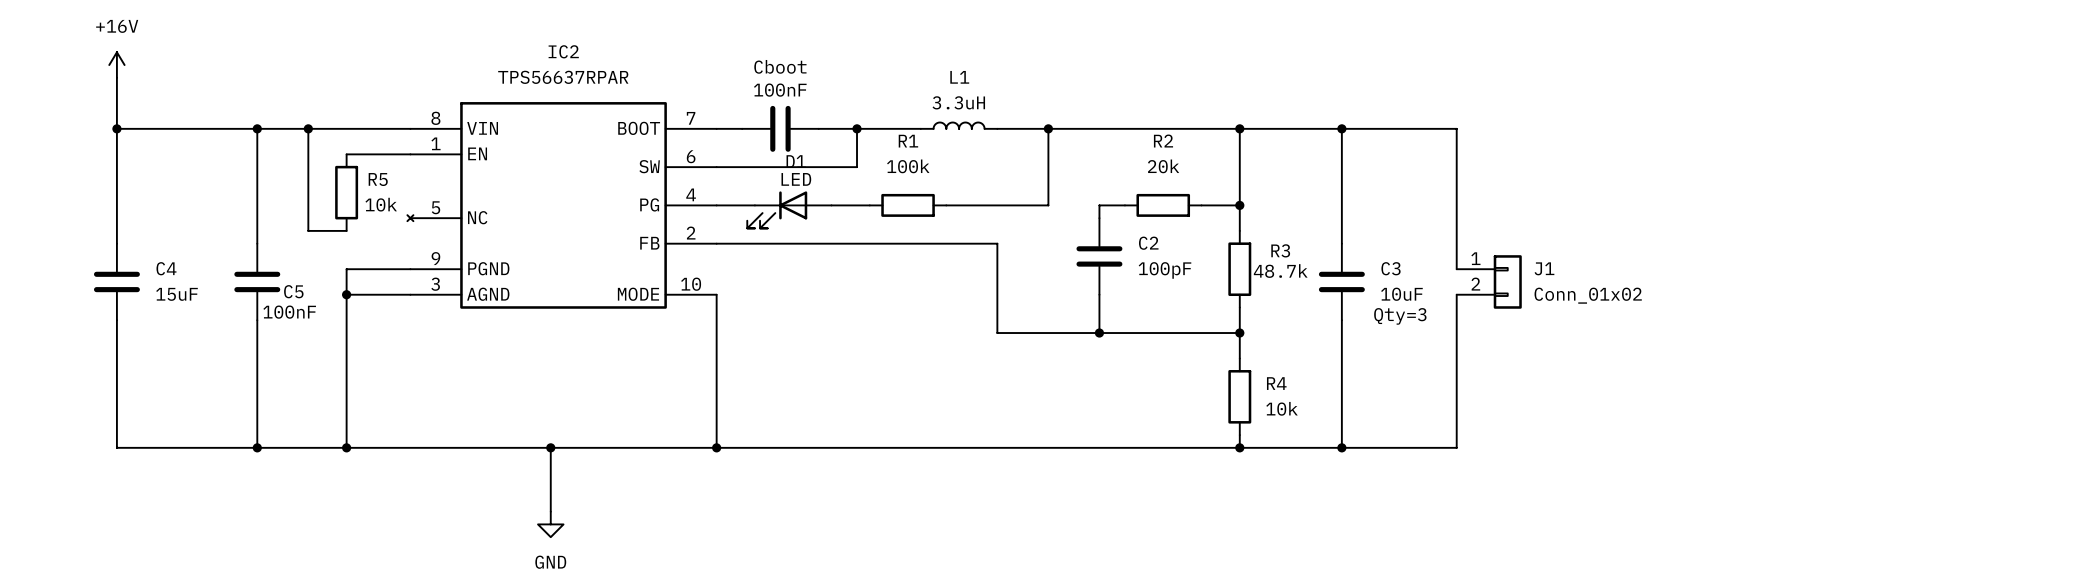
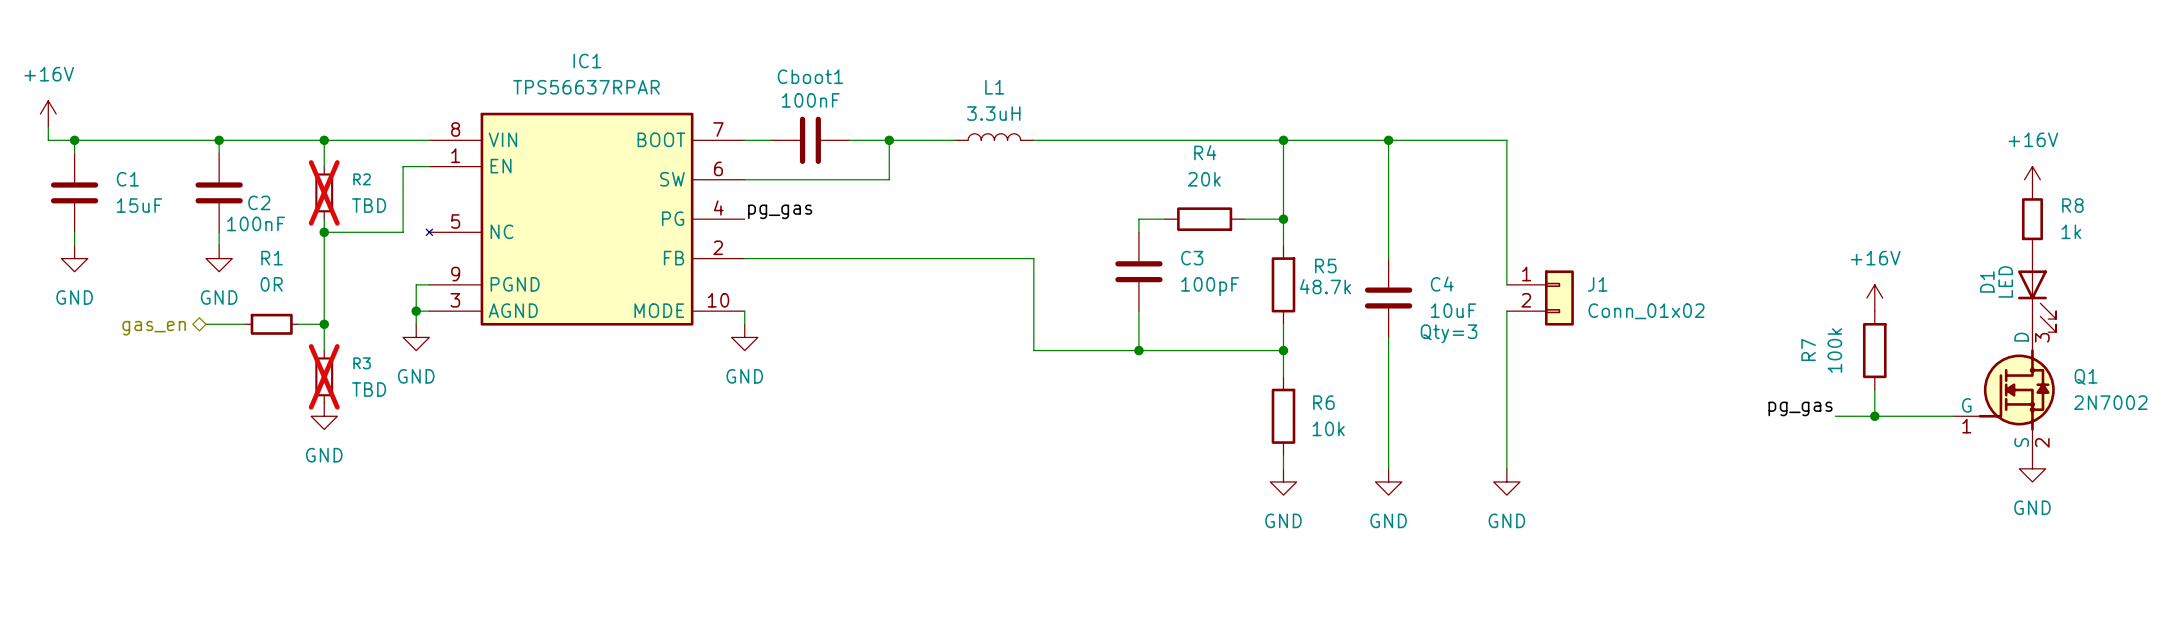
IC2 name: IC2 (563, 51) -> IC1 (587, 61)
power symbol position: +16V (116, 65) -> +16V (48, 114)
Cboot name: Cboot (780, 66) -> Cboot1 (810, 76)
wire: (116, 77) (116, 243) -> none
wire: none -> (48, 127) (48, 140) (127, 140)
wire: none -> (74, 140) (74, 153)
junction: none -> (74, 140)
junction: (116, 128) -> none
wire: none -> (219, 140) (219, 153)
junction: none -> (219, 140)
wire: (257, 128) (257, 243) -> none
junction: (257, 128) -> none
wire: (1048, 128) (1048, 205) (946, 205) -> none
junction: (1048, 128) -> none
R2 name: R2 (1163, 141) -> R4 (1205, 152)
wire: (346, 154) (384, 154) -> (324, 232) (403, 232) (403, 166)
R1 value: 100k (908, 166) -> none
power symbol: none -> +16V (2032, 179)
C1: none -> 15uF (74, 192)
C2: none -> 100nF (219, 192)
R2: none -> TBD (324, 192)
R5: 10k (346, 192) -> none
R1 symbol: [869, 193, 947, 217] -> [245, 313, 298, 335]
label: none -> pg_gas (780, 211)
wire: (716, 205) (754, 205) -> none
wire: (831, 205) (869, 205) -> none
R8: none -> (2032, 219)
D1 rotation: 0° (777, 209) -> 90° counterclockwise (2037, 301)
D1 position: (789, 209) -> (2037, 288)
wire: none -> (74, 232) (74, 245)
wire: none -> (219, 232) (219, 245)
junction: none -> (324, 232)
wire: (308, 230) (346, 230) -> (324, 245) (324, 350)
power symbol: none -> GND (74, 258)
power symbol: none -> GND (219, 258)
C2 name: C2 (1148, 243) -> C3 (1192, 258)
R3 name: R3 (1280, 250) -> R5 (1325, 265)
R1 text: none -> 0R (271, 284)
C3 name: C3 (1391, 268) -> C4 (1442, 284)
wire: (397, 269) (346, 269) (346, 447) -> (416, 284) (416, 324)
C4: 15uF (116, 281) -> none
C5: 100nF (257, 281) -> none
power symbol: none -> +16V (1874, 298)
wire: (346, 294) (397, 294) -> none
junction: (346, 294) -> none
junction: none -> (416, 311)
wire: none -> (205, 324) (245, 324)
wire: none -> (297, 324) (324, 324)
junction: none -> (324, 324)
wire: (716, 307) (716, 447) -> none
hierarchical label: none -> gas_en (154, 328)
wire: (116, 320) (116, 447) (1456, 447) -> none
wire: (257, 320) (257, 447) -> none
power symbol: none -> GND (416, 337)
power symbol: none -> GND (744, 337)
R7: none -> 100k (1874, 350)
R3: none -> TBD (324, 376)
wire: none -> (1874, 389) (1874, 416)
Q1: none -> (2004, 389)
R4 name: R4 (1276, 383) -> R6 (1323, 402)
label: none -> pg_gas (1800, 408)
power symbol: none -> GND (324, 416)
wire: none -> (1835, 416) (1953, 416)
junction: none -> (1874, 416)
junction: (257, 447) -> none
junction: (346, 447) -> none
wire: (550, 447) (550, 511) -> none
junction: (550, 447) -> none
junction: (716, 447) -> none
junction: (1239, 447) -> none
junction: (1341, 447) -> none
power symbol: none -> GND (2032, 468)
power symbol: none -> GND (1283, 481)
power symbol: none -> GND (1388, 481)
power symbol: none -> GND (1506, 481)
power symbol: GND (550, 524) -> none

